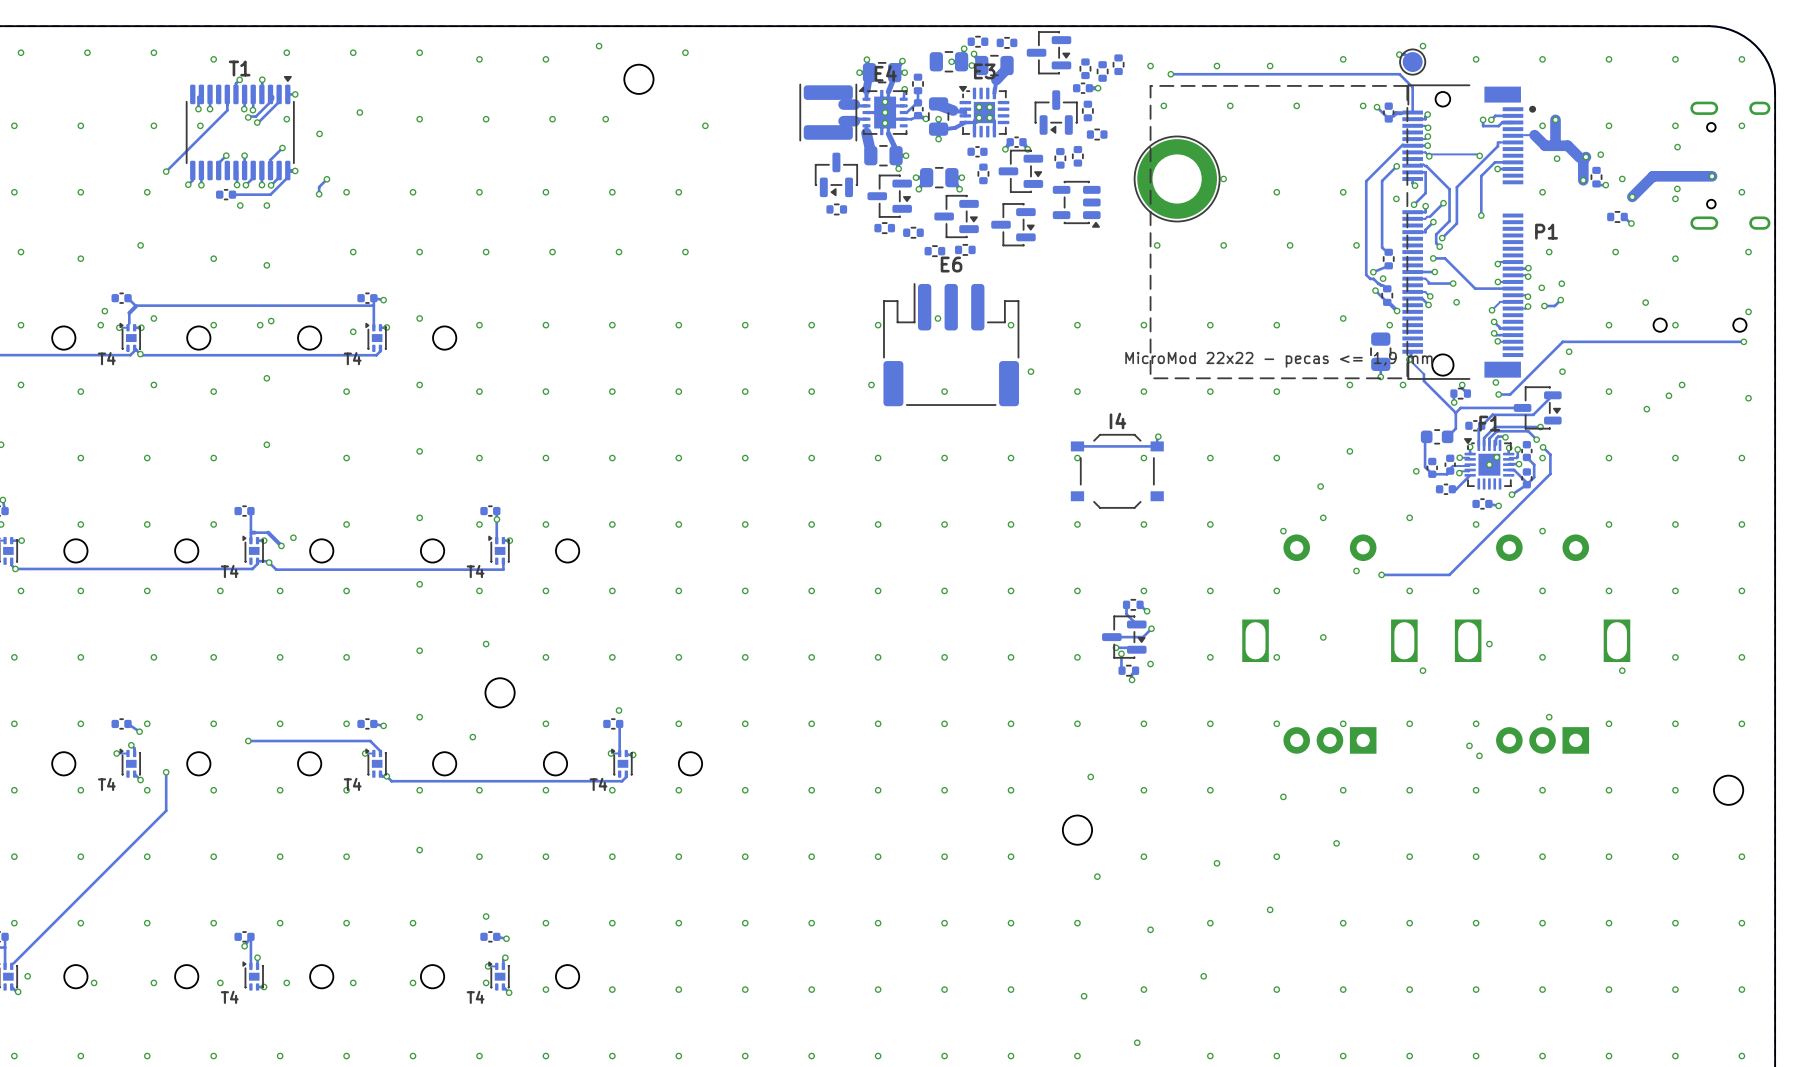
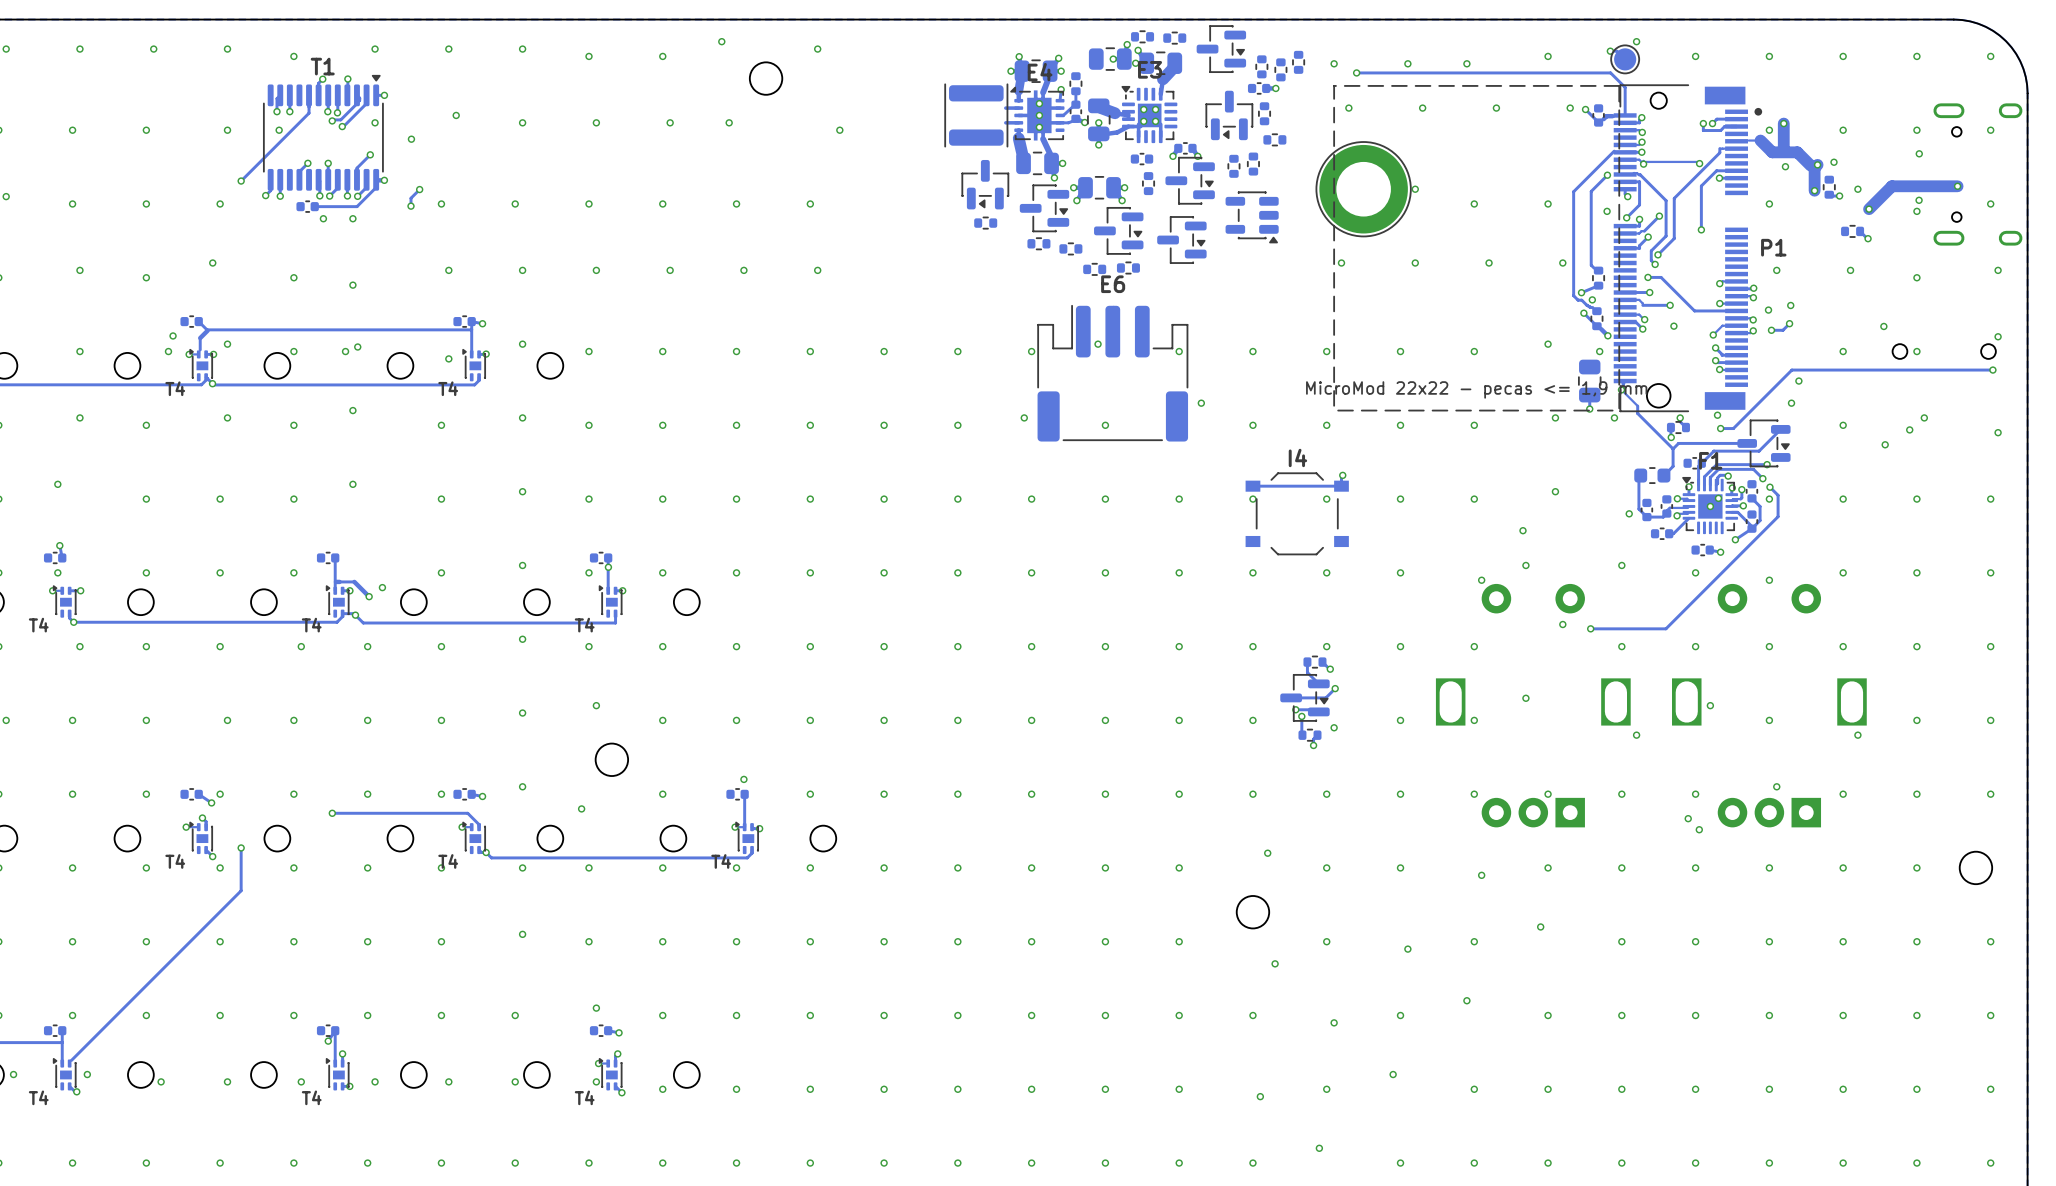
track: (854, 104) (843, 104) -> none
track: (854, 121) (843, 121) -> none

